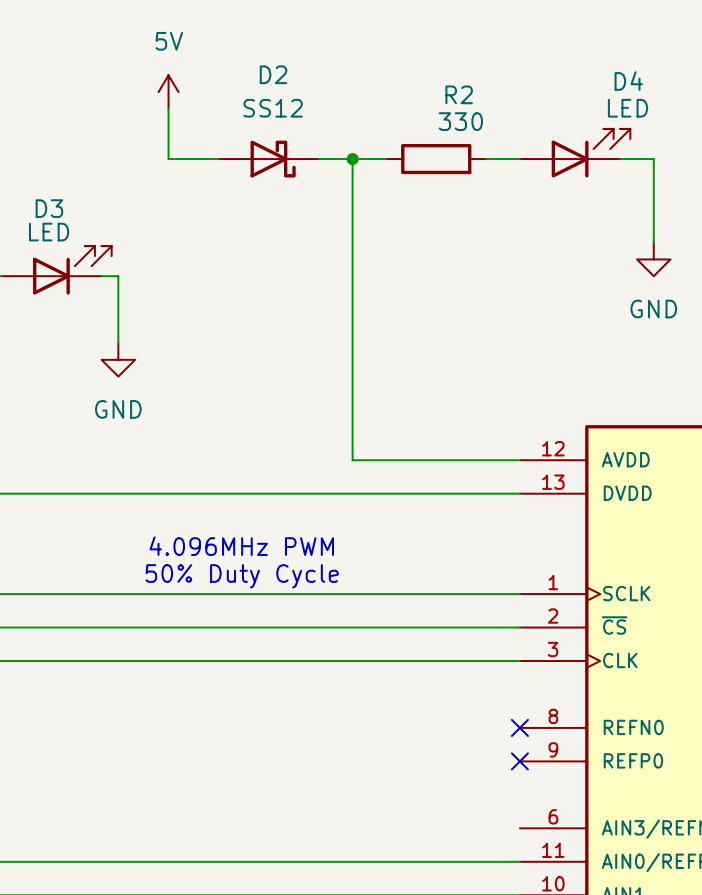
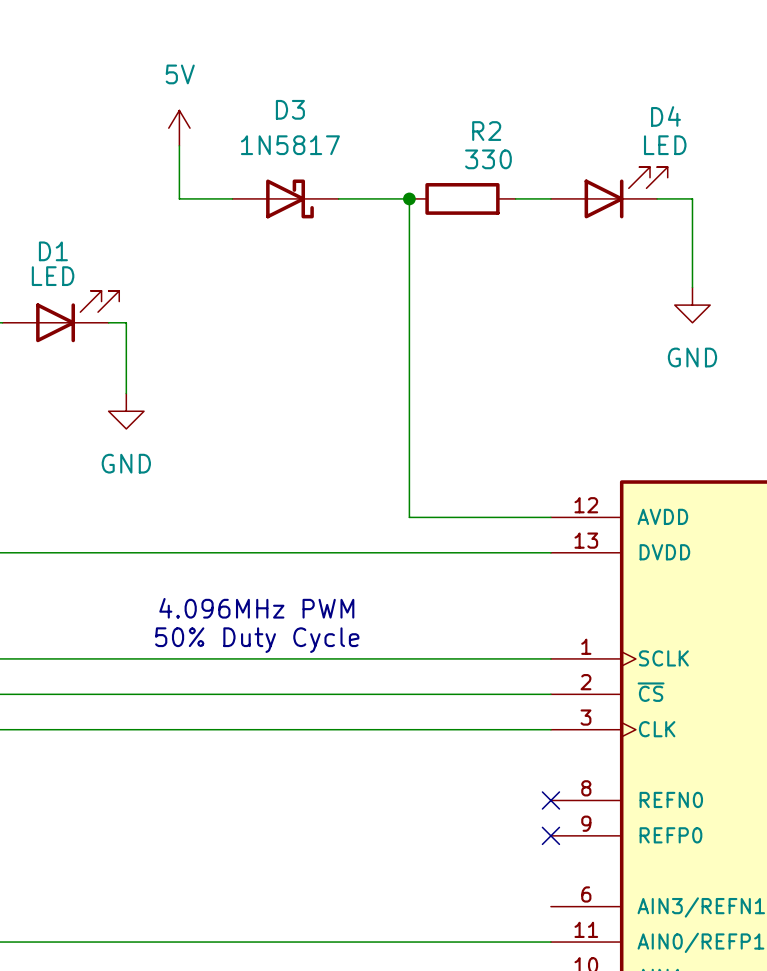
D2 name: D2 (273, 74) -> D3 (290, 109)
D2 value: SS12 (273, 108) -> 1N5817 (290, 145)
wire: (352, 159) (352, 460) (386, 460) -> (409, 198) (409, 517)
junction position: (352, 159) -> (409, 198)
D3 name: D3 (49, 208) -> D1 (53, 251)

